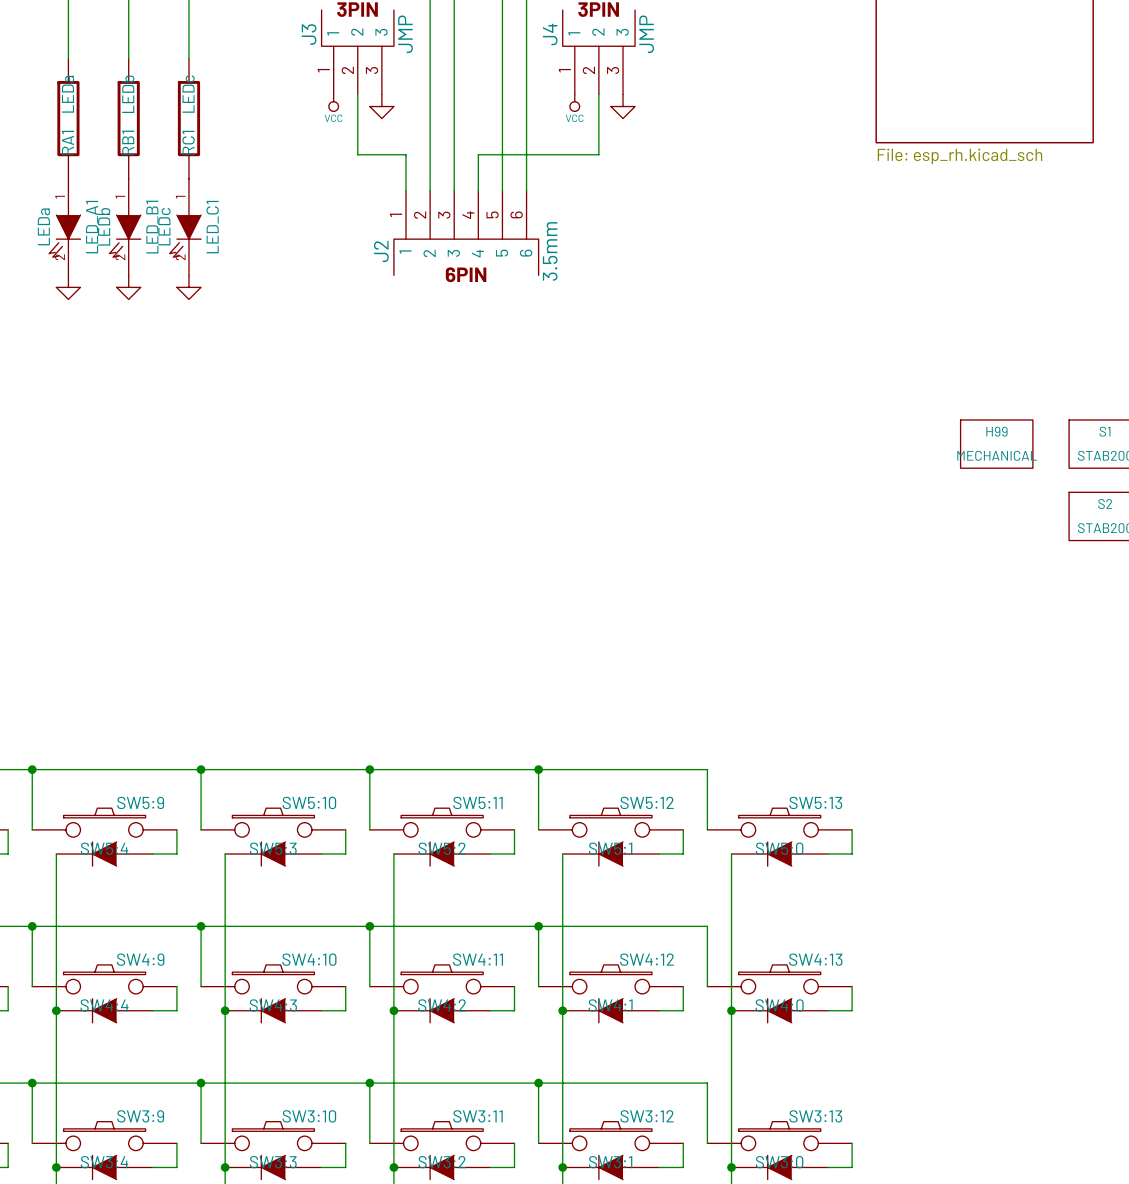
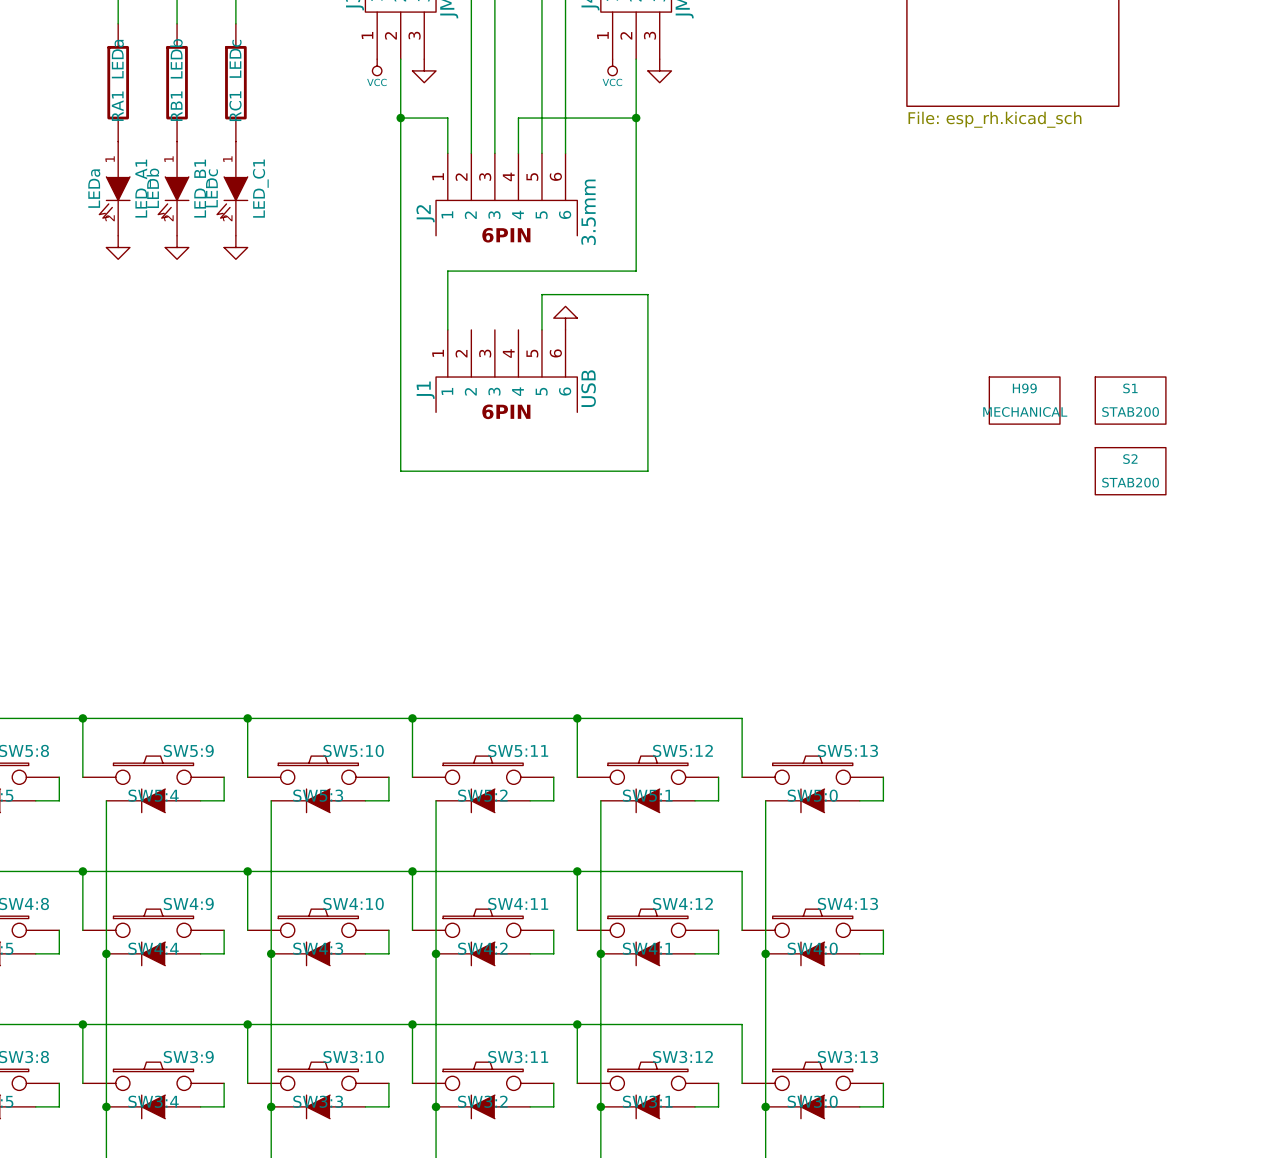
wire: none -> (400, 118) (400, 471) (647, 471) (647, 294) (541, 294) (541, 329)
junction: none -> (400, 118)
wire: none -> (636, 118) (636, 271) (447, 271) (447, 329)
junction: none -> (636, 118)
power symbol: none -> (565, 318)
J1: none -> USB (506, 371)

